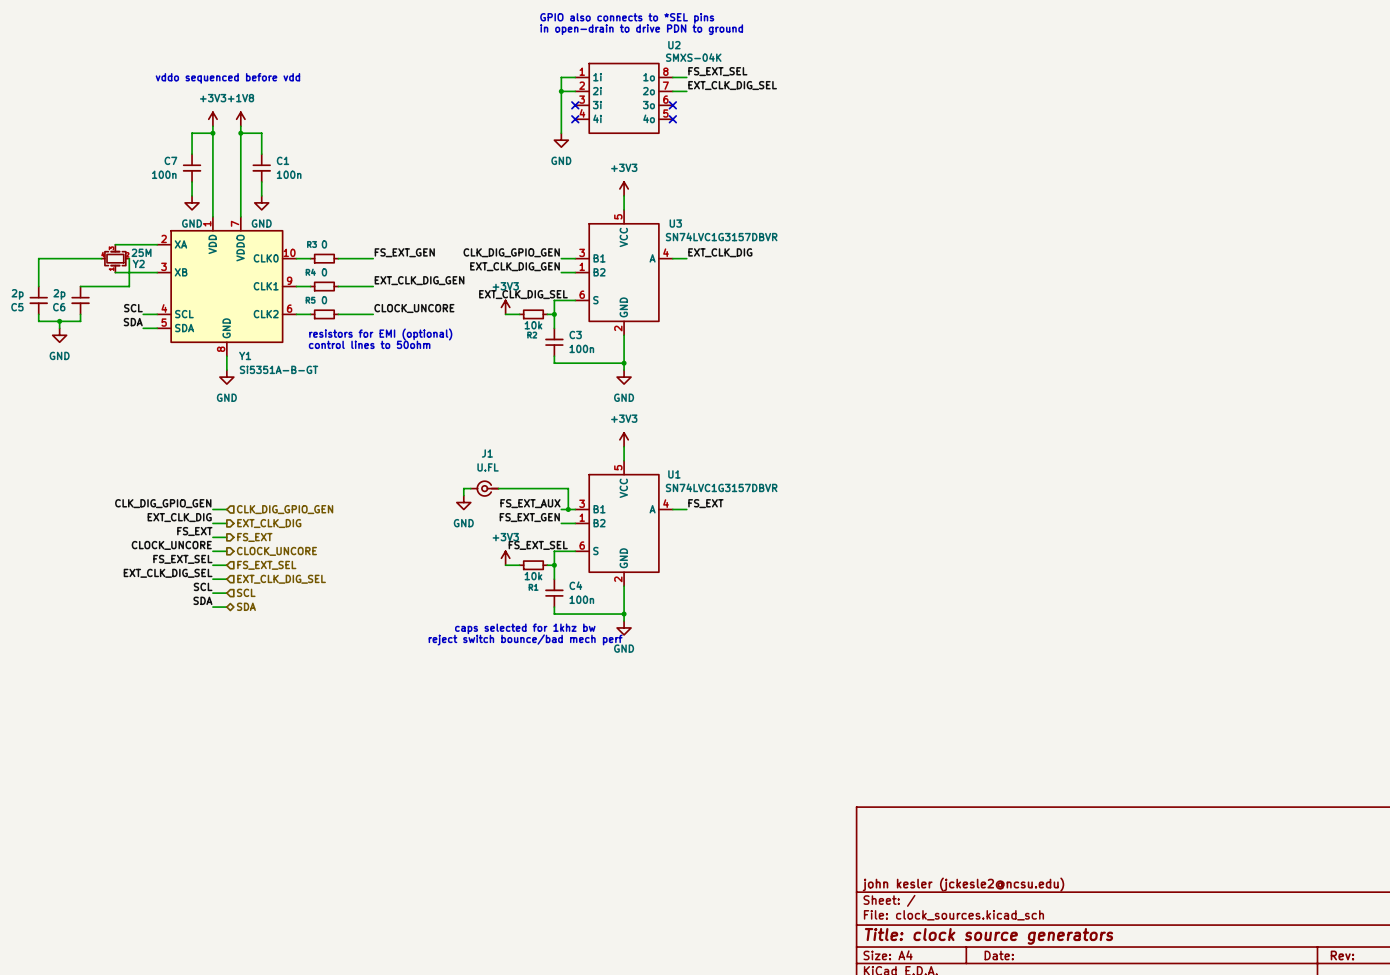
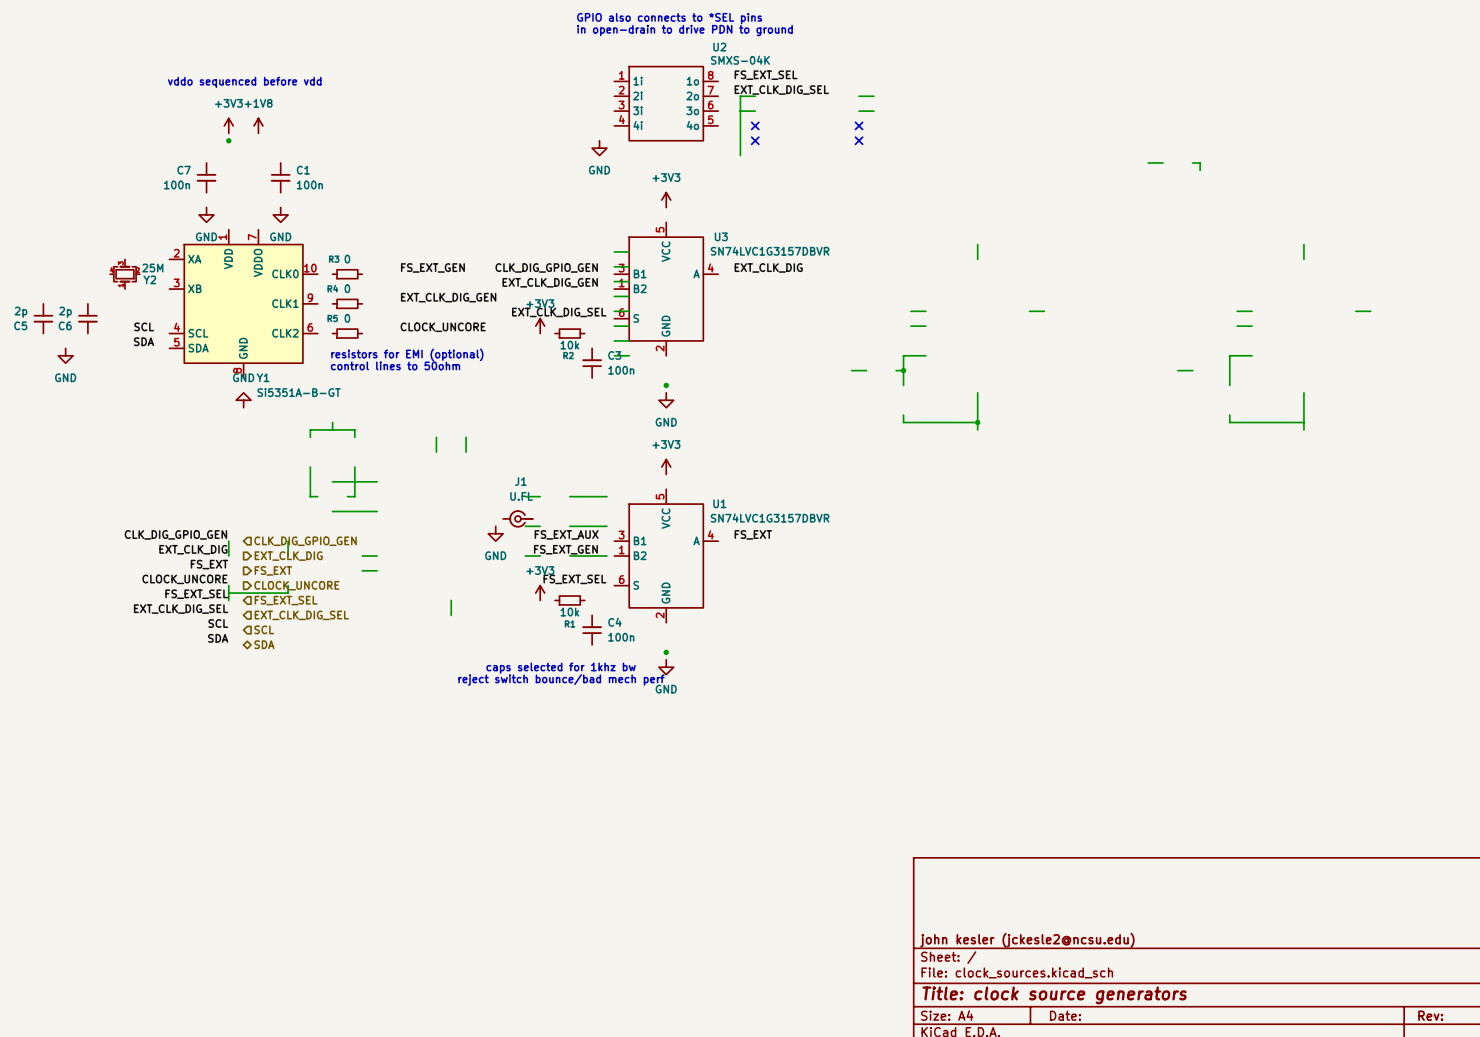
wire: (575, 77) (561, 77) (561, 133) -> (755, 96) (740, 96) (740, 155)
wire: (672, 77) (686, 77) -> (859, 96) (873, 96)
wire: (561, 91) (575, 91) -> (740, 111) (755, 111)
junction: (561, 91) -> none
wire: (672, 91) (686, 91) -> (859, 111) (873, 111)
no-connect mark: (575, 105) -> none
no-connect mark: (672, 105) -> none
no-connect mark: (575, 119) -> none
no-connect mark: (672, 119) -> none
no-connect mark: none -> (755, 125)
no-connect mark: none -> (859, 125)
wire: (212, 126) (212, 216) -> none
wire: (240, 126) (240, 216) -> none
wire: (212, 133) (192, 133) (192, 154) -> none
wire: (240, 133) (261, 133) (261, 154) -> none
junction: (240, 133) -> none
no-connect mark: none -> (755, 140)
no-connect mark: none -> (859, 140)
wire: none -> (1148, 162) (1163, 162)
wire: none -> (1192, 162) (1200, 162) (1200, 170)
wire: (192, 181) (192, 195) -> none
wire: (261, 181) (261, 195) -> none
wire: (624, 195) (624, 209) -> none
wire: none -> (977, 244) (977, 259)
wire: none -> (1303, 244) (1303, 259)
wire: none -> (614, 251) (629, 251)
wire: (115, 244) (157, 244) -> none
wire: (101, 258) (38, 258) (38, 286) -> none
wire: (129, 258) (129, 286) (80, 286) -> none
wire: (296, 258) (310, 258) -> none
wire: (338, 258) (373, 258) -> none
wire: (561, 258) (575, 258) -> (614, 281) (629, 281)
wire: (672, 258) (686, 258) -> (614, 266) (629, 266)
wire: (115, 272) (157, 272) -> none
wire: (561, 272) (575, 272) -> (614, 296) (629, 296)
wire: (296, 286) (310, 286) -> none
wire: (338, 286) (373, 286) -> none
wire: none -> (614, 311) (629, 311)
wire: none -> (910, 311) (925, 311)
wire: none -> (1029, 311) (1044, 311)
wire: none -> (1237, 311) (1252, 311)
wire: none -> (1355, 311) (1370, 311)
wire: (575, 300) (554, 300) (554, 328) -> none
wire: none -> (910, 326) (925, 326)
wire: none -> (1237, 326) (1252, 326)
wire: (38, 314) (38, 321) (80, 321) (80, 314) -> none
wire: (143, 314) (157, 314) -> none
wire: (296, 314) (310, 314) -> none
wire: (338, 314) (373, 314) -> none
wire: (505, 314) (519, 314) -> (614, 326) (629, 326)
wire: (547, 314) (554, 314) -> none
junction: (554, 314) -> none
wire: (59, 321) (59, 328) -> none
junction: (59, 321) -> none
wire: none -> (614, 340) (629, 340)
wire: (143, 328) (157, 328) -> none
wire: none -> (614, 355) (629, 355)
wire: (624, 335) (624, 370) -> none
wire: none -> (925, 355) (903, 355) (903, 385)
wire: none -> (1252, 355) (1229, 355) (1229, 385)
wire: none -> (851, 370) (866, 370)
wire: none -> (896, 370) (903, 370)
junction: none -> (903, 370)
wire: none -> (1177, 370) (1192, 370)
wire: (226, 356) (226, 370) -> none
wire: (554, 356) (554, 363) (624, 363) -> none
wire: none -> (977, 392) (977, 429)
wire: none -> (1303, 392) (1303, 429)
power symbol rotation: 0° (226, 377) -> 180° (243, 400)
wire: none -> (903, 415) (903, 422) (977, 422)
wire: none -> (1229, 415) (1229, 422) (1303, 422)
wire: none -> (332, 422) (332, 429)
junction: none -> (977, 422)
wire: none -> (310, 437) (310, 429) (354, 429) (354, 437)
wire: none -> (436, 437) (436, 452)
wire: none -> (466, 437) (466, 452)
wire: none -> (310, 467) (310, 496) (317, 496)
wire: none -> (354, 467) (354, 496) (347, 496)
wire: (624, 446) (624, 460) -> none
wire: none -> (332, 481) (377, 481)
wire: none -> (525, 496) (540, 496)
wire: none -> (569, 496) (606, 496)
wire: none -> (332, 511) (377, 511)
wire: (470, 488) (463, 488) (463, 495) -> none
wire: (498, 488) (568, 488) (568, 509) -> none
wire: none -> (569, 526) (606, 526)
wire: (212, 509) (226, 509) -> (228, 541) (228, 555)
wire: none -> (288, 541) (288, 555)
wire: (561, 509) (575, 509) -> (525, 526) (540, 526)
junction: (568, 509) -> none
wire: (672, 509) (686, 509) -> none
wire: (212, 523) (226, 523) -> (362, 555) (377, 555)
wire: none -> (569, 555) (599, 555)
wire: (568, 523) (575, 523) -> none
wire: (212, 537) (226, 537) -> (362, 570) (377, 570)
wire: (212, 551) (226, 551) -> (228, 585) (228, 600)
wire: none -> (288, 585) (288, 593) (228, 593)
wire: (575, 551) (554, 551) (554, 579) -> none
wire: (212, 565) (226, 565) -> none
wire: none -> (451, 600) (451, 615)
wire: (505, 565) (519, 565) -> (525, 555) (540, 555)
wire: (547, 565) (554, 565) -> none
junction: (554, 565) -> none
wire: (212, 579) (226, 579) -> none
wire: (624, 586) (624, 620) -> none
wire: (212, 593) (226, 593) -> none
wire: (212, 607) (226, 607) -> none
wire: (554, 607) (554, 614) (624, 614) -> none

